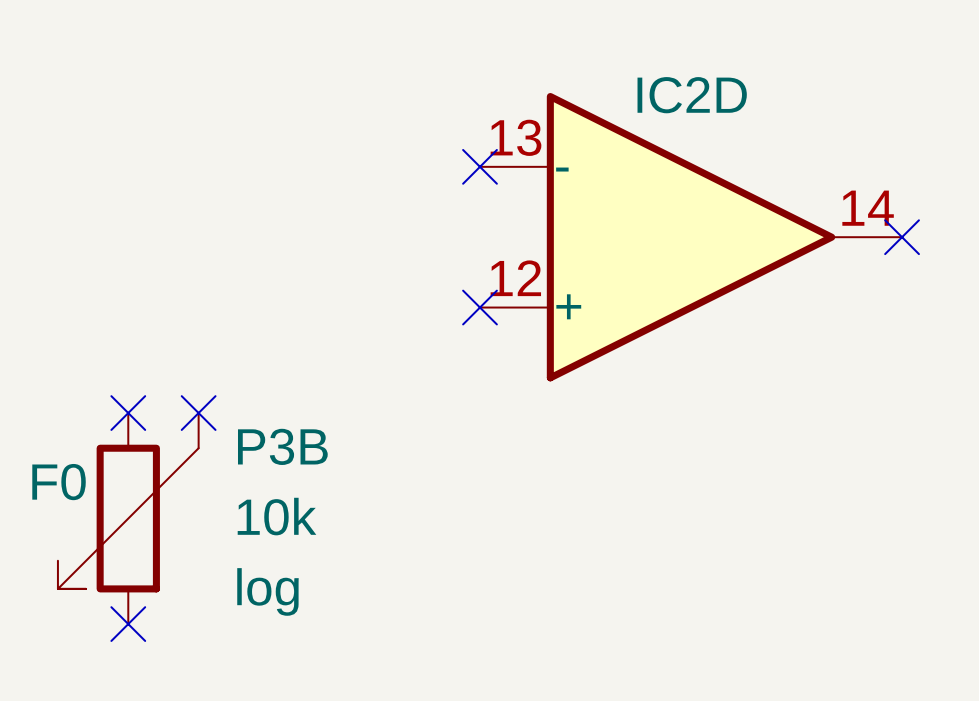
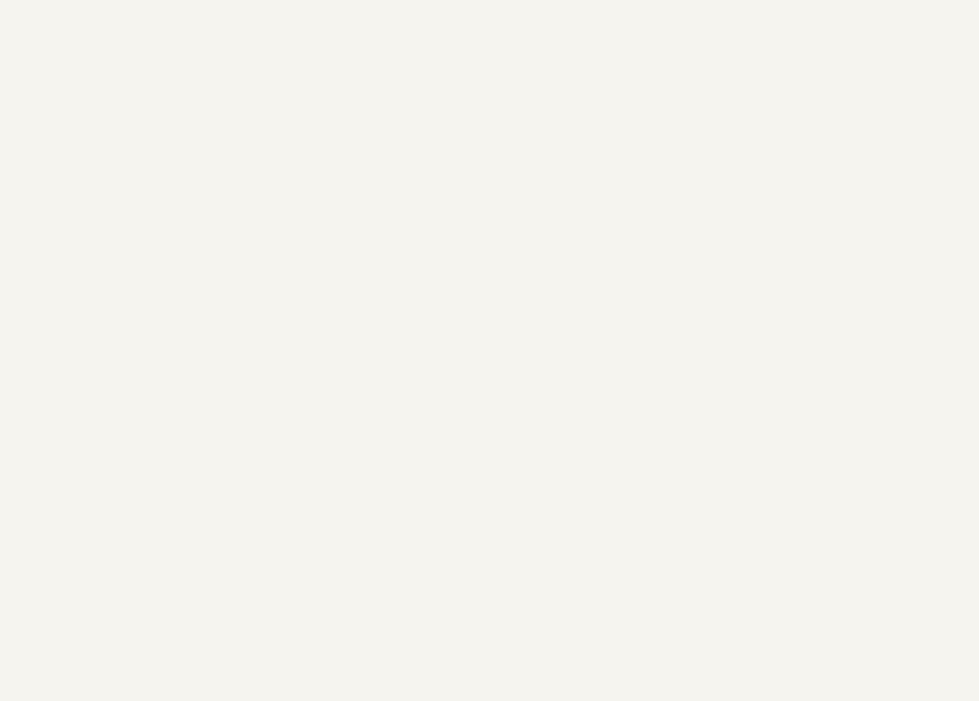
no-connect mark: (480, 166) -> none
IC2D: (691, 237) -> none
no-connect mark: (902, 237) -> none
no-connect mark: (480, 307) -> none
no-connect mark: (128, 413) -> none
no-connect mark: (198, 413) -> none
P3B: 10k (128, 518) -> none
no-connect mark: (128, 624) -> none

